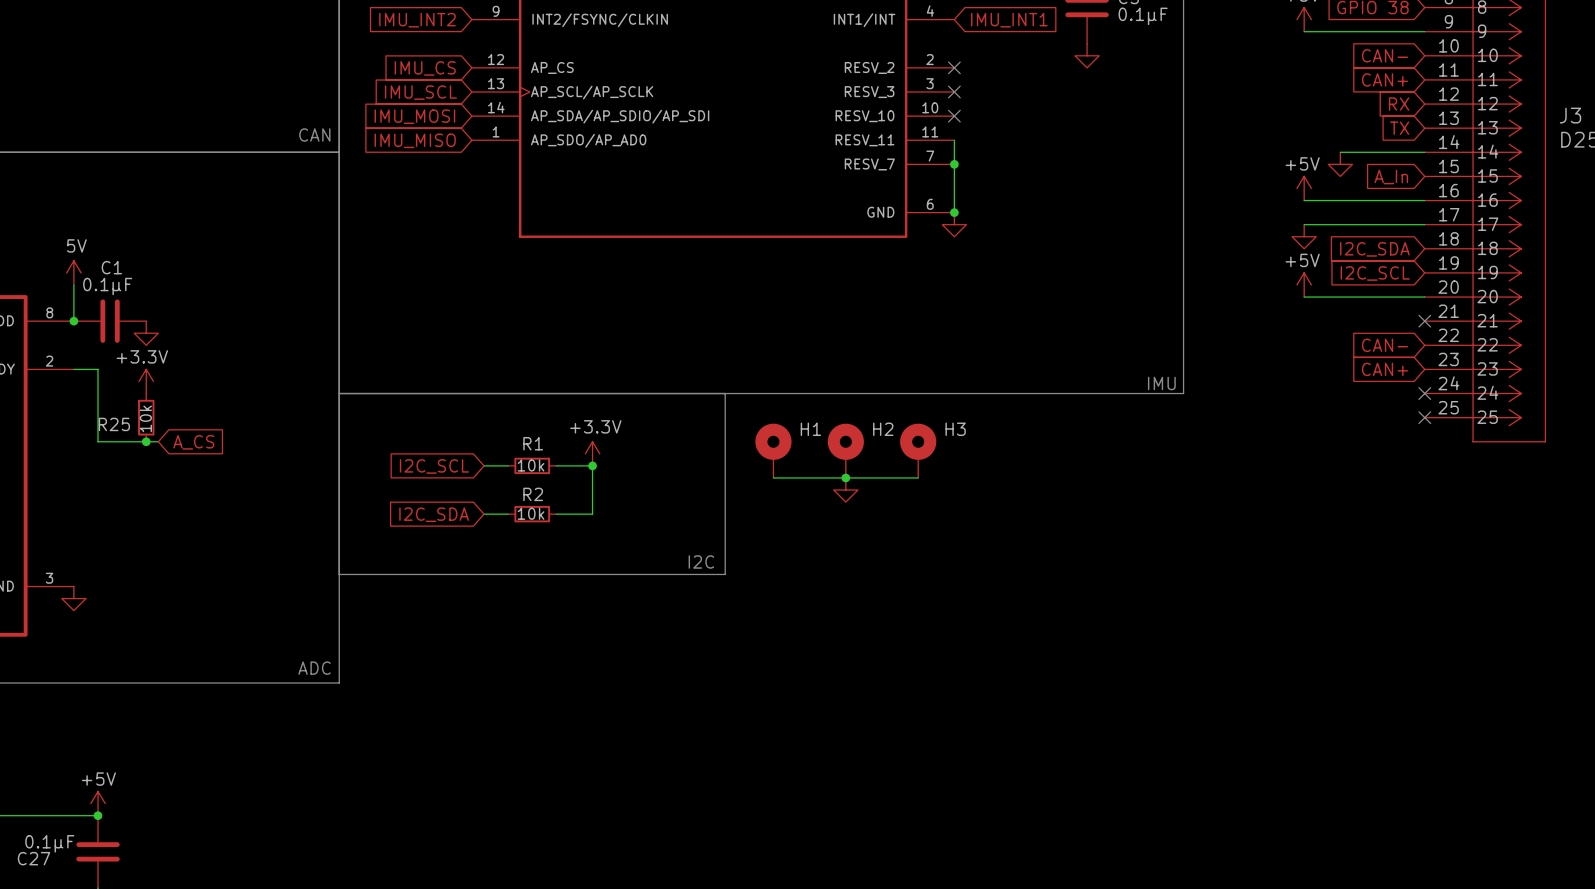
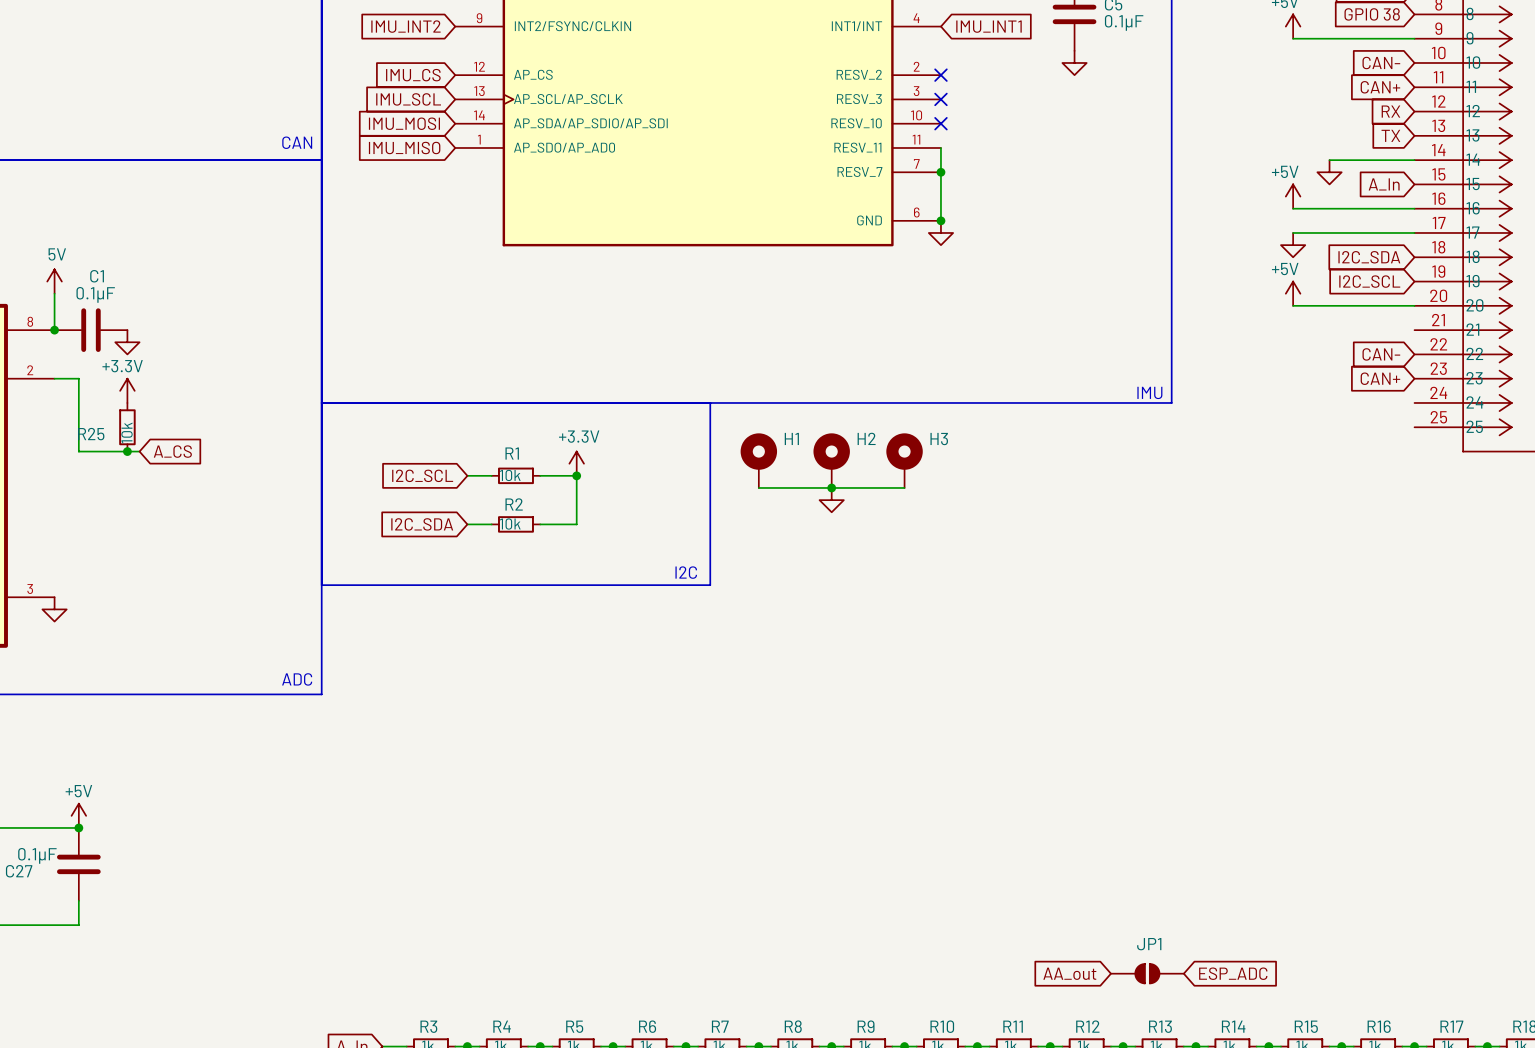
no-connect mark: (1424, 321) -> none
no-connect mark: (1424, 393) -> none
no-connect mark: (1424, 417) -> none

